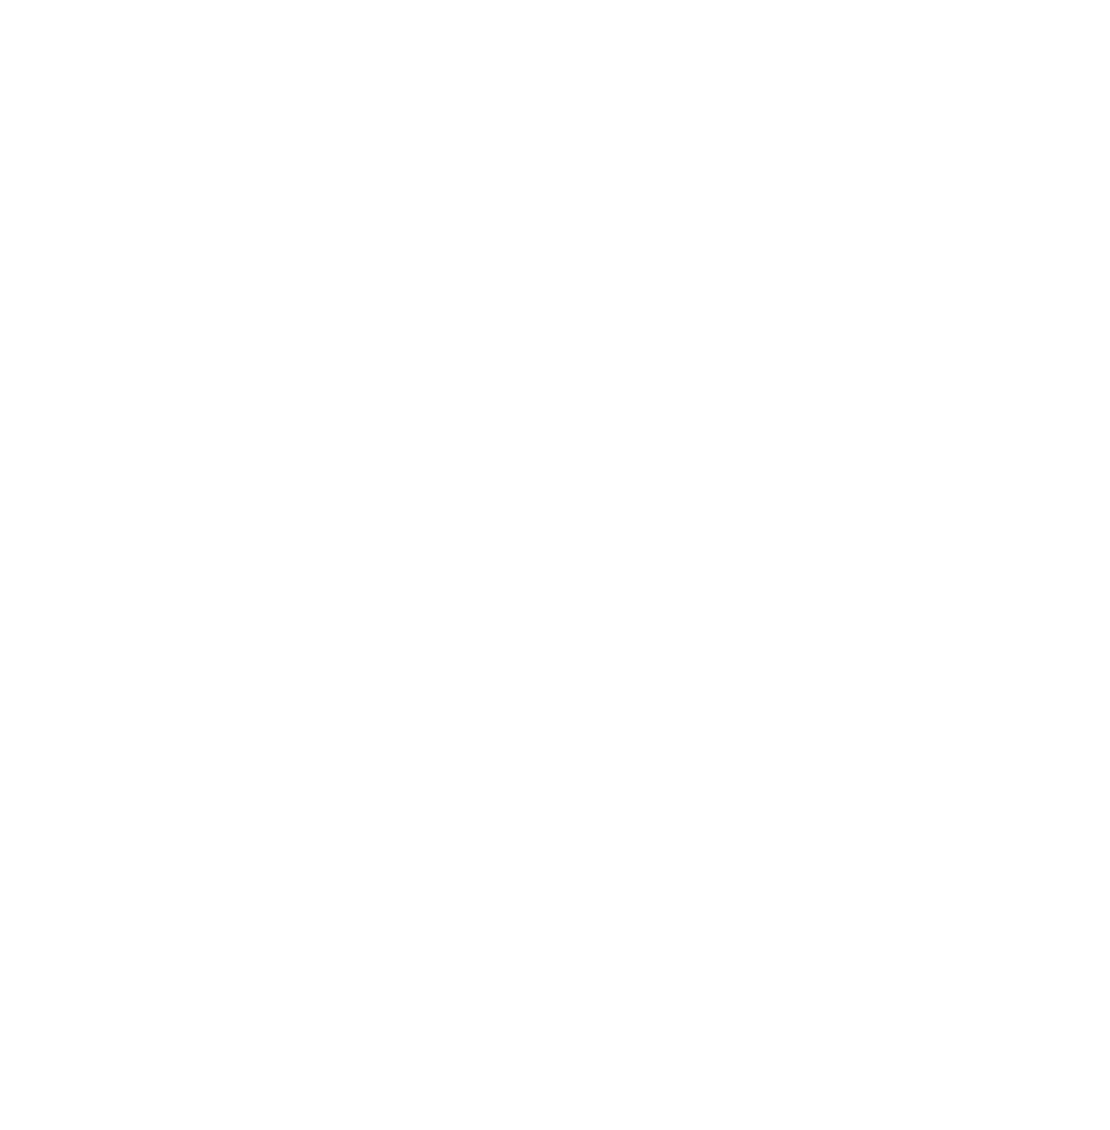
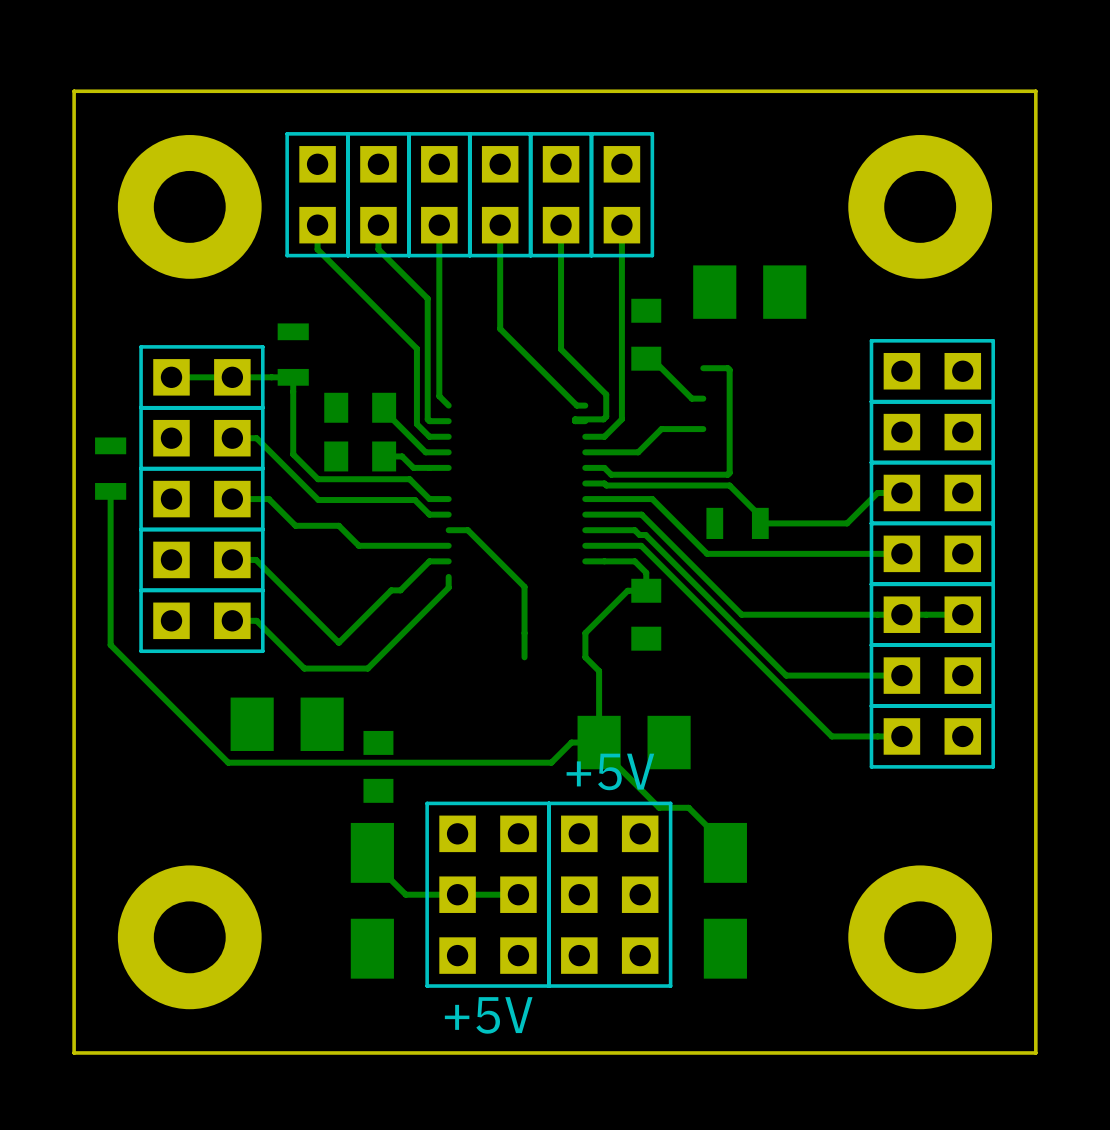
board edge: none -> (74, 91) (74, 1052) (1035, 1052) (1035, 91) (74, 91)
part: none -> (317, 194)
part: none -> (378, 194)
part: none -> (439, 194)
part: none -> (500, 194)
part: none -> (561, 194)
part: none -> (621, 194)
part: none -> (189, 206)
part: none -> (920, 206)
bottom track: none -> (317, 225) (317, 249) (416, 348) (416, 424) (429, 436) (448, 436)
bottom track: none -> (378, 225) (378, 249) (427, 298) (427, 419) (429, 421) (448, 421)
bottom track: none -> (439, 225) (439, 396) (448, 405)
bottom track: none -> (500, 225) (500, 328) (576, 405) (585, 405)
bottom track: none -> (561, 225) (561, 349) (606, 394) (606, 416) (603, 419) (575, 419) (575, 421) (585, 421)
bottom track: none -> (621, 225) (621, 419) (604, 436) (585, 436)
part: none -> (749, 292)
part: none -> (646, 334)
part: none -> (293, 354)
bottom track: none -> (646, 358) (651, 358) (691, 398) (703, 398)
bottom track: none -> (703, 368) (727, 368) (729, 370) (729, 472) (727, 474) (611, 474) (604, 467) (585, 467)
part: none -> (932, 371)
bottom track: none -> (171, 377) (293, 377) (293, 454) (318, 479) (409, 479) (429, 499) (448, 499)
part: none -> (201, 377)
part: none -> (360, 407)
bottom track: none -> (384, 407) (384, 410) (425, 452) (448, 452)
bottom track: none -> (703, 429) (661, 429) (638, 452) (585, 452)
part: none -> (932, 432)
part: none -> (201, 438)
bottom track: none -> (232, 438) (256, 438) (318, 500) (414, 500) (429, 514) (448, 514)
part: none -> (360, 456)
bottom track: none -> (384, 456) (402, 456) (413, 467) (448, 467)
part: none -> (110, 468)
bottom track: none -> (585, 483) (604, 483) (606, 485) (729, 485) (760, 516) (760, 523) (847, 523) (877, 492) (901, 492)
bottom track: none -> (110, 491) (110, 645) (228, 762) (551, 762) (571, 742) (599, 742)
part: none -> (932, 492)
part: none -> (201, 499)
bottom track: none -> (232, 499) (268, 499) (295, 525) (338, 525) (358, 545) (448, 545)
bottom track: none -> (585, 499) (652, 499) (707, 553) (901, 553)
bottom track: none -> (585, 514) (641, 514) (741, 614) (962, 614)
part: none -> (737, 523)
bottom track: none -> (448, 530) (467, 530) (524, 586) (524, 657)
bottom track: none -> (585, 530) (634, 530) (639, 535) (645, 535) (786, 675) (901, 675)
bottom track: none -> (585, 545) (641, 545) (831, 736) (901, 736)
part: none -> (932, 553)
part: none -> (201, 559)
bottom track: none -> (232, 559) (256, 559) (338, 642) (391, 590) (400, 590) (429, 561) (448, 561)
bottom track: none -> (585, 561) (634, 561) (646, 572) (646, 590) (627, 590) (585, 633) (585, 657) (599, 671) (599, 747) (659, 807) (688, 807) (725, 844) (725, 852)
bottom track: none -> (448, 576) (448, 587) (367, 668) (304, 668) (256, 620) (232, 620)
part: none -> (646, 614)
part: none -> (932, 614)
part: none -> (201, 620)
part: none -> (932, 675)
part: none -> (287, 724)
part: none -> (932, 736)
part: none -> (634, 742)
part: none -> (378, 766)
bottom track: none -> (372, 852) (372, 861) (405, 894) (518, 894)
part: none -> +5V (488, 894)
part: none -> +5V (609, 894)
part: none -> (372, 900)
part: none -> (725, 900)
part: none -> (189, 937)
part: none -> (920, 937)

